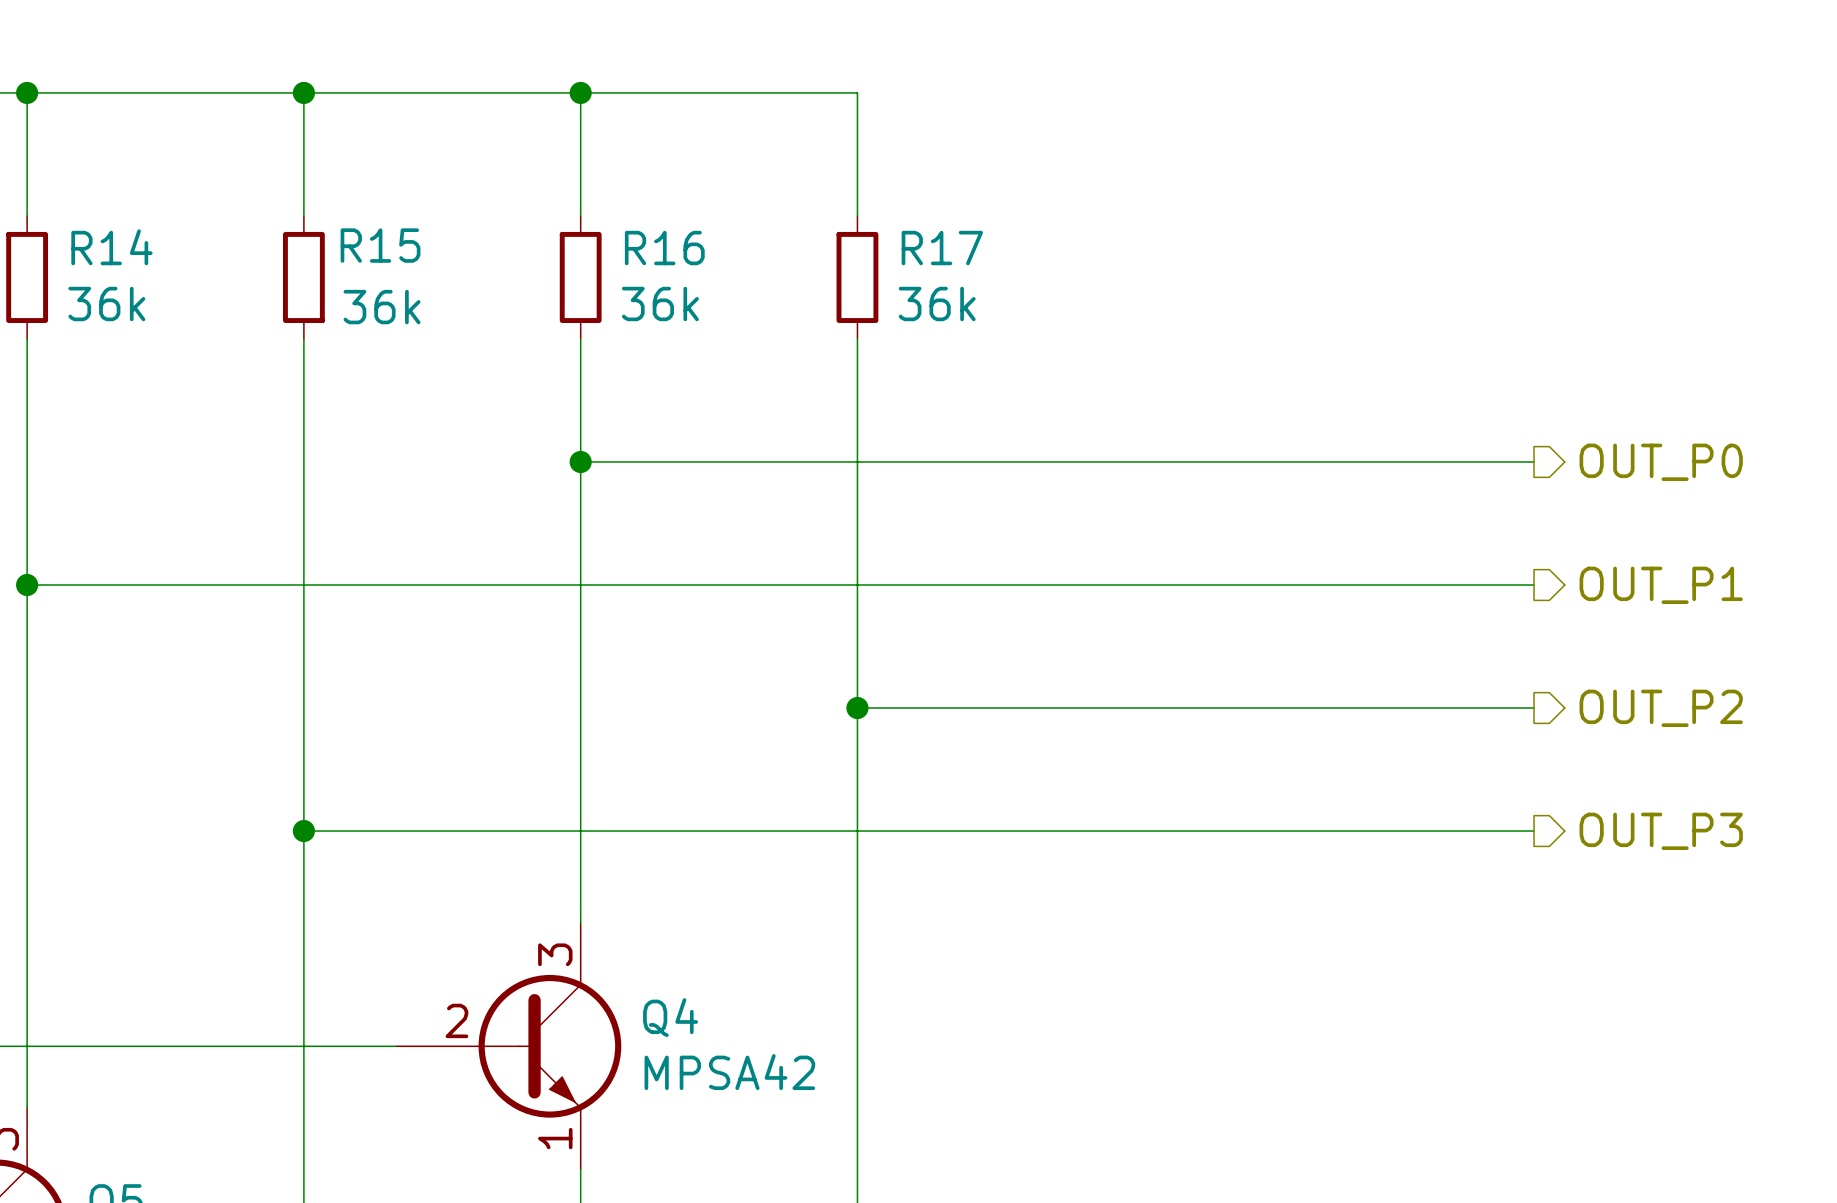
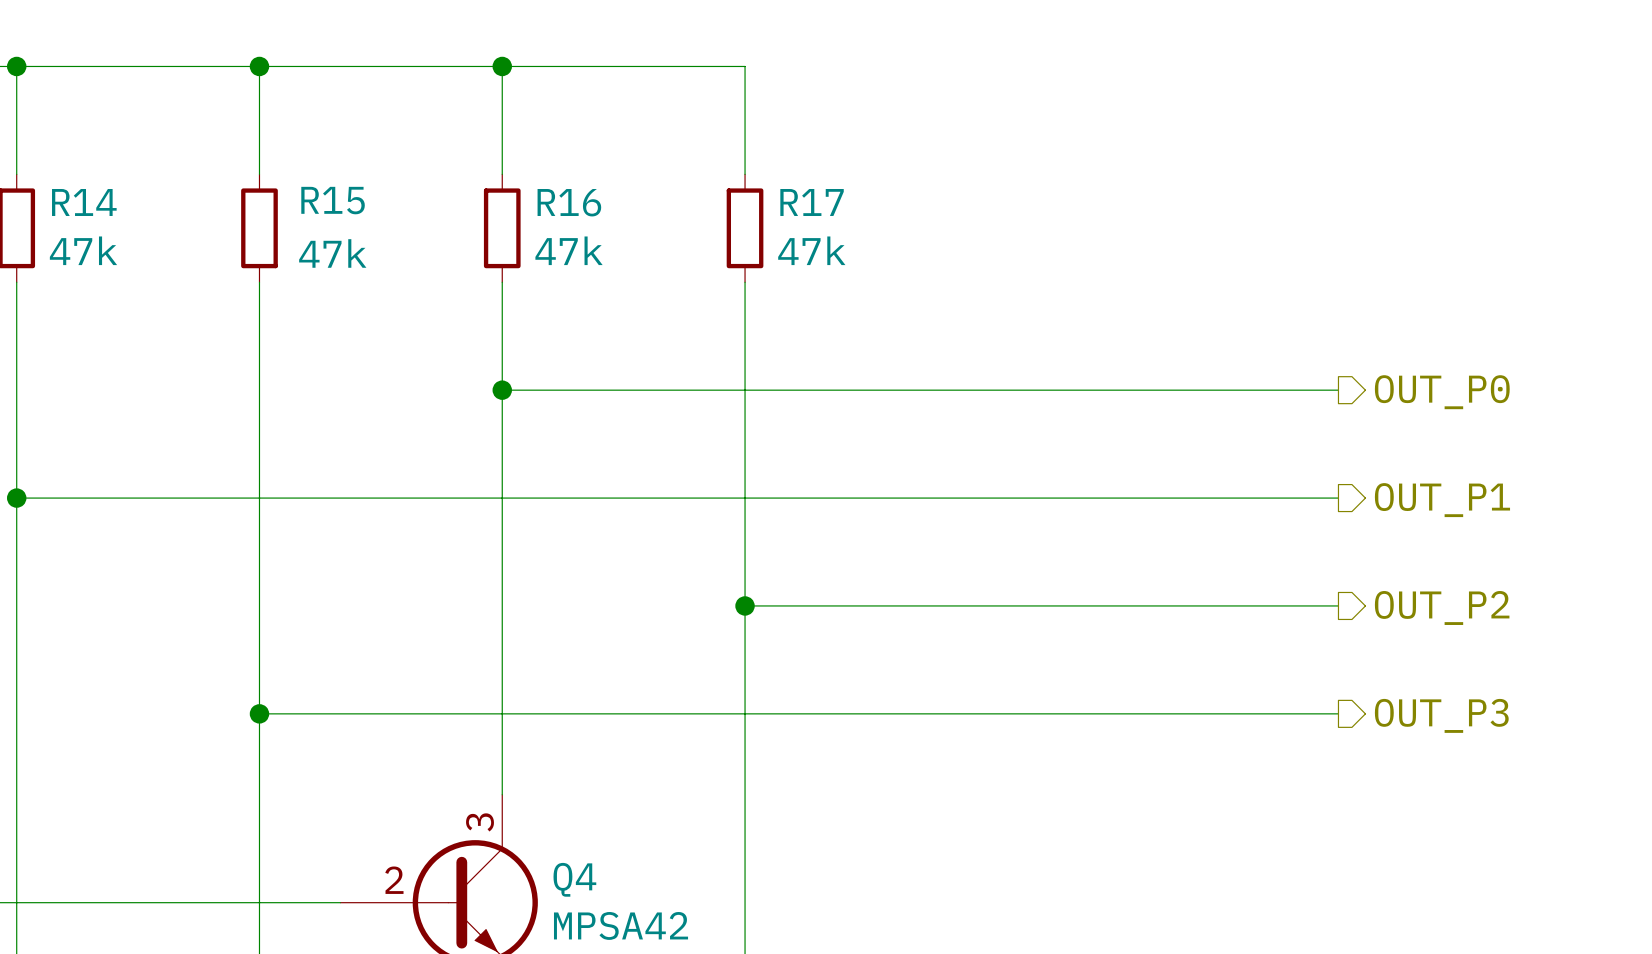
R14 value: 36k (106, 304) -> 47k (83, 250)
R16 value: 36k (660, 304) -> 47k (569, 250)
R17 value: 36k (937, 304) -> 47k (811, 250)
R15 value: 36k (382, 307) -> 47k (332, 253)

